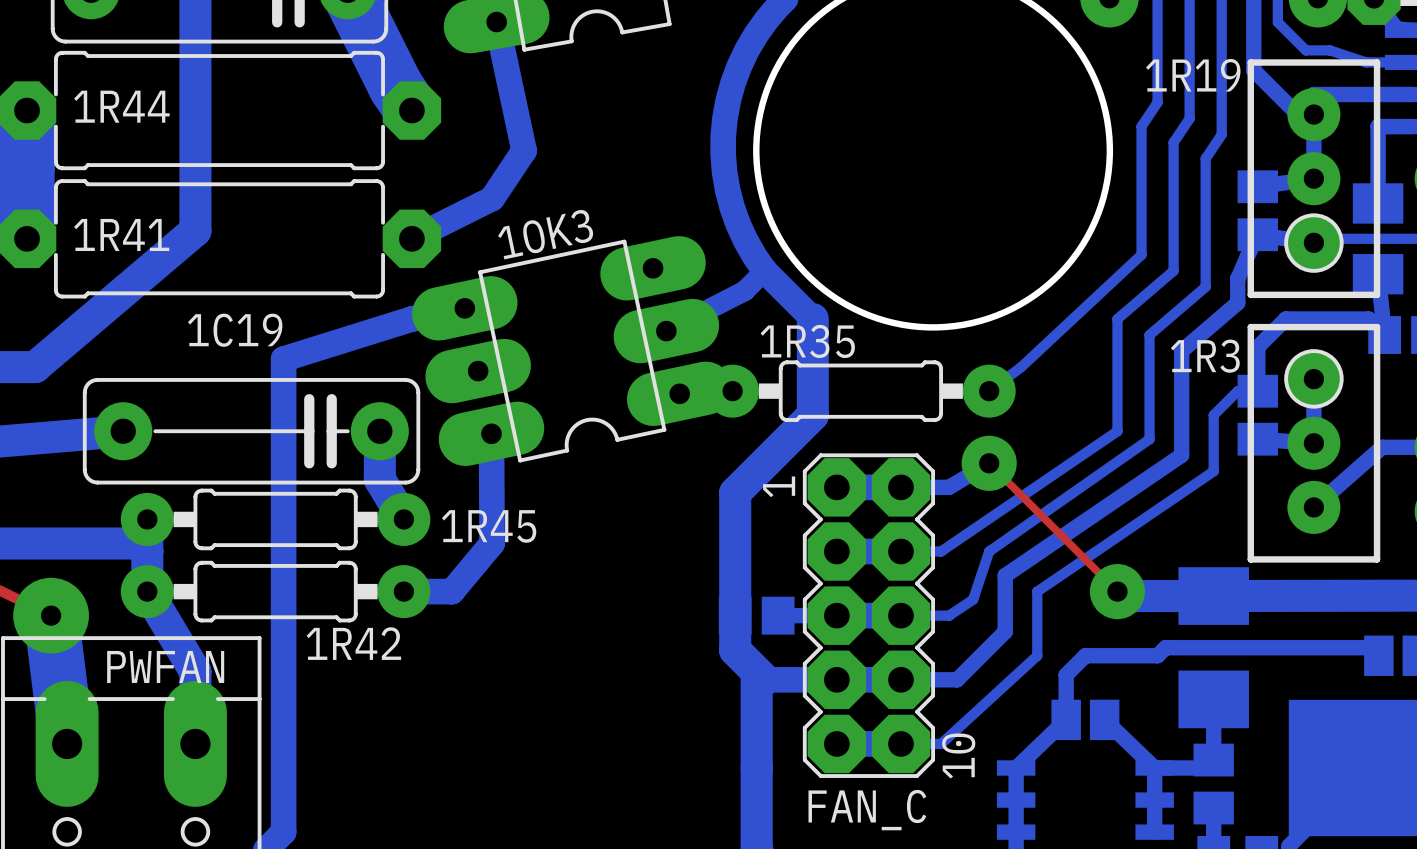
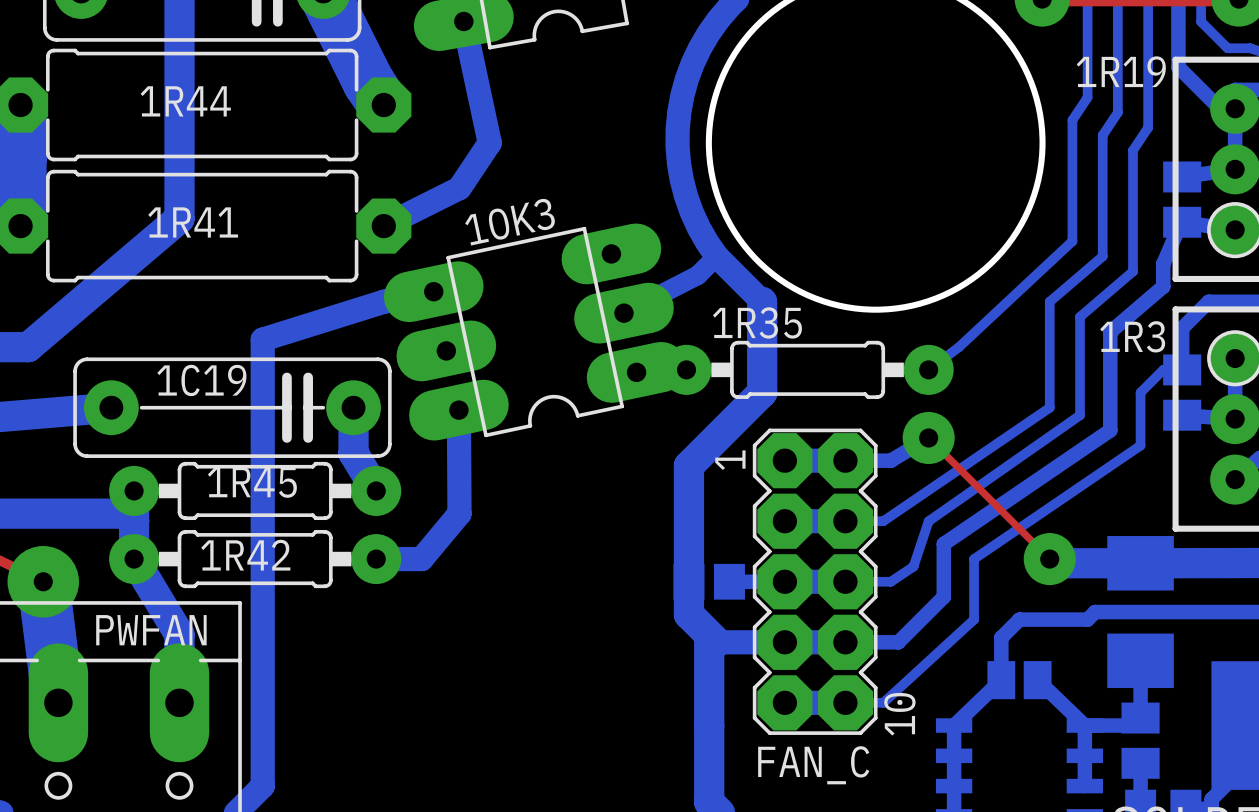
1R44 name position: 1R44 (121, 106) -> 1R44 (185, 101)
1R41 name position: 1R41 (121, 234) -> 1R41 (193, 222)
1C19 name position: 1C19 (235, 330) -> 1C19 (201, 380)
1R45 name position: 1R45 (489, 526) -> 1R45 (252, 482)
1R42 name position: 1R42 (353, 643) -> 1R42 (245, 555)

